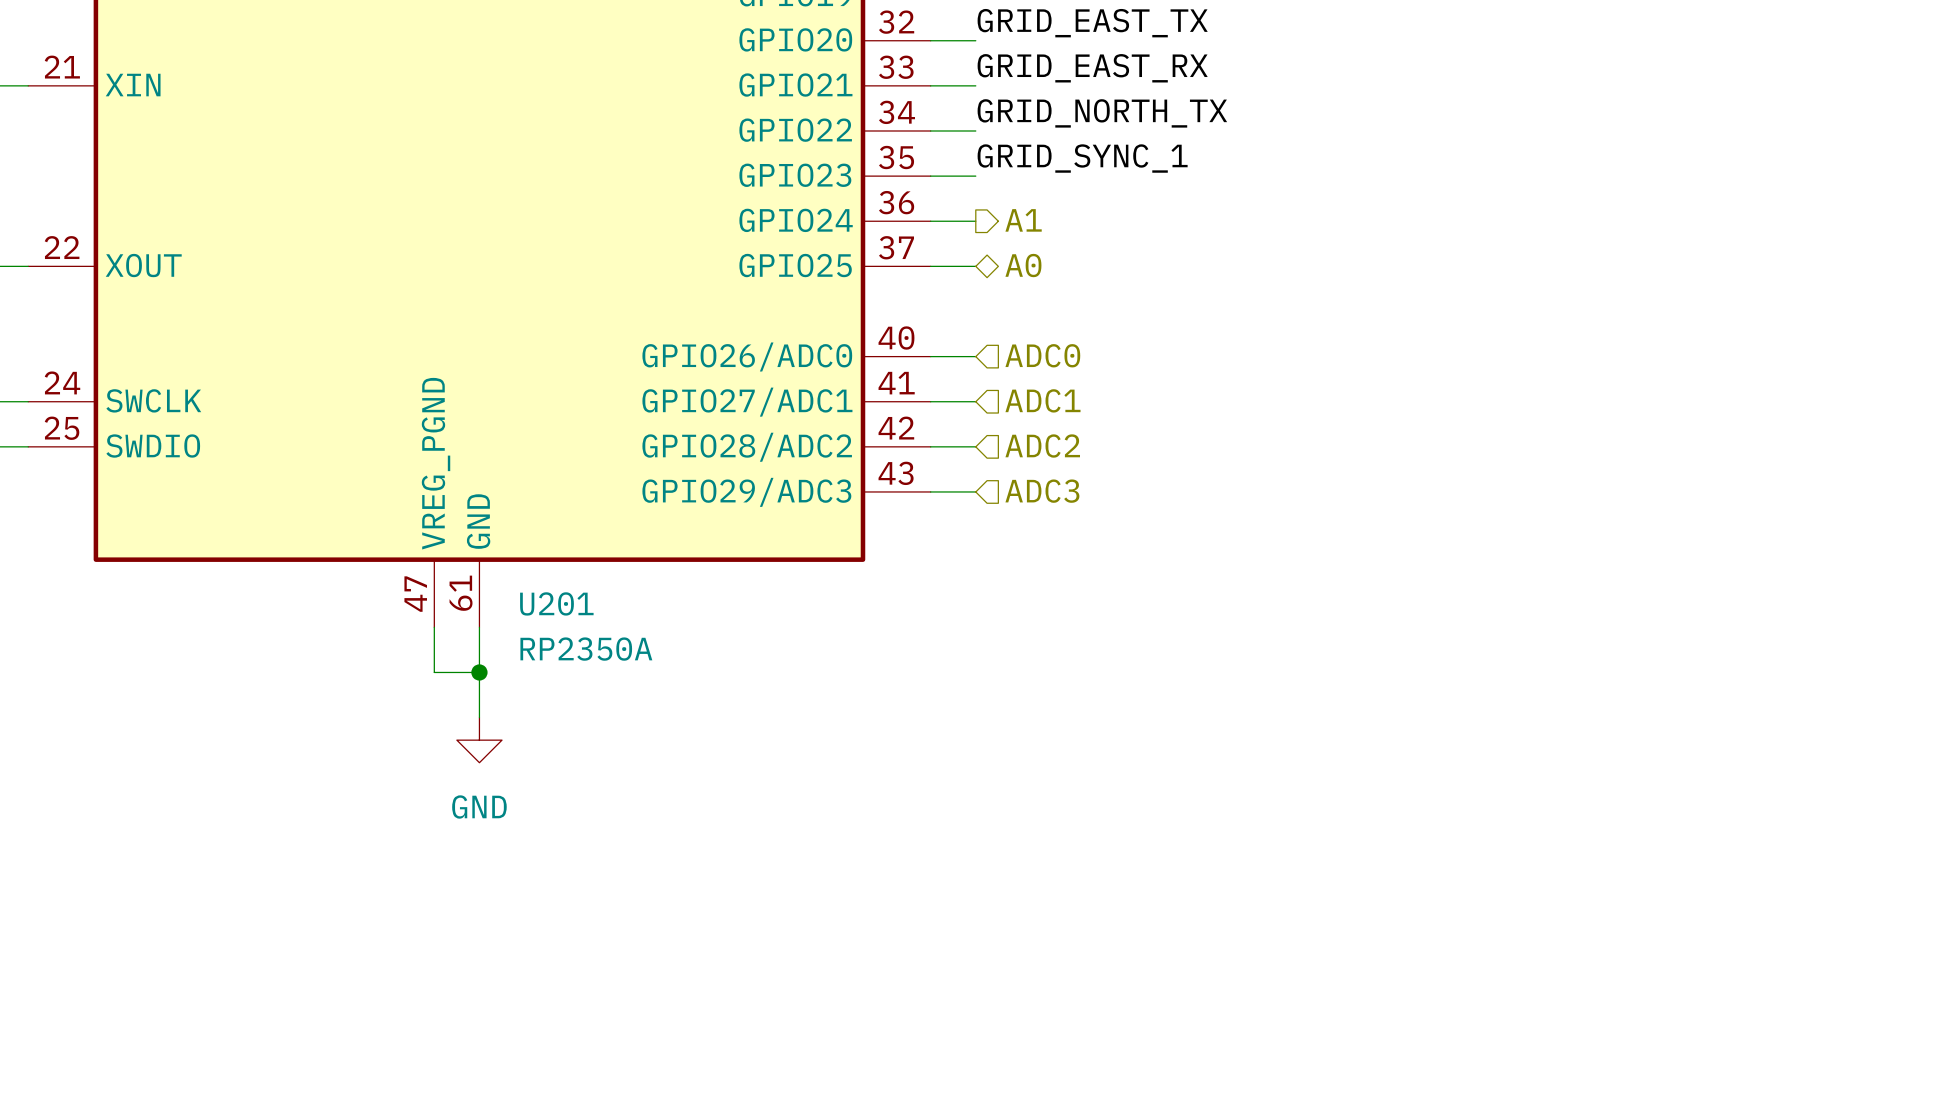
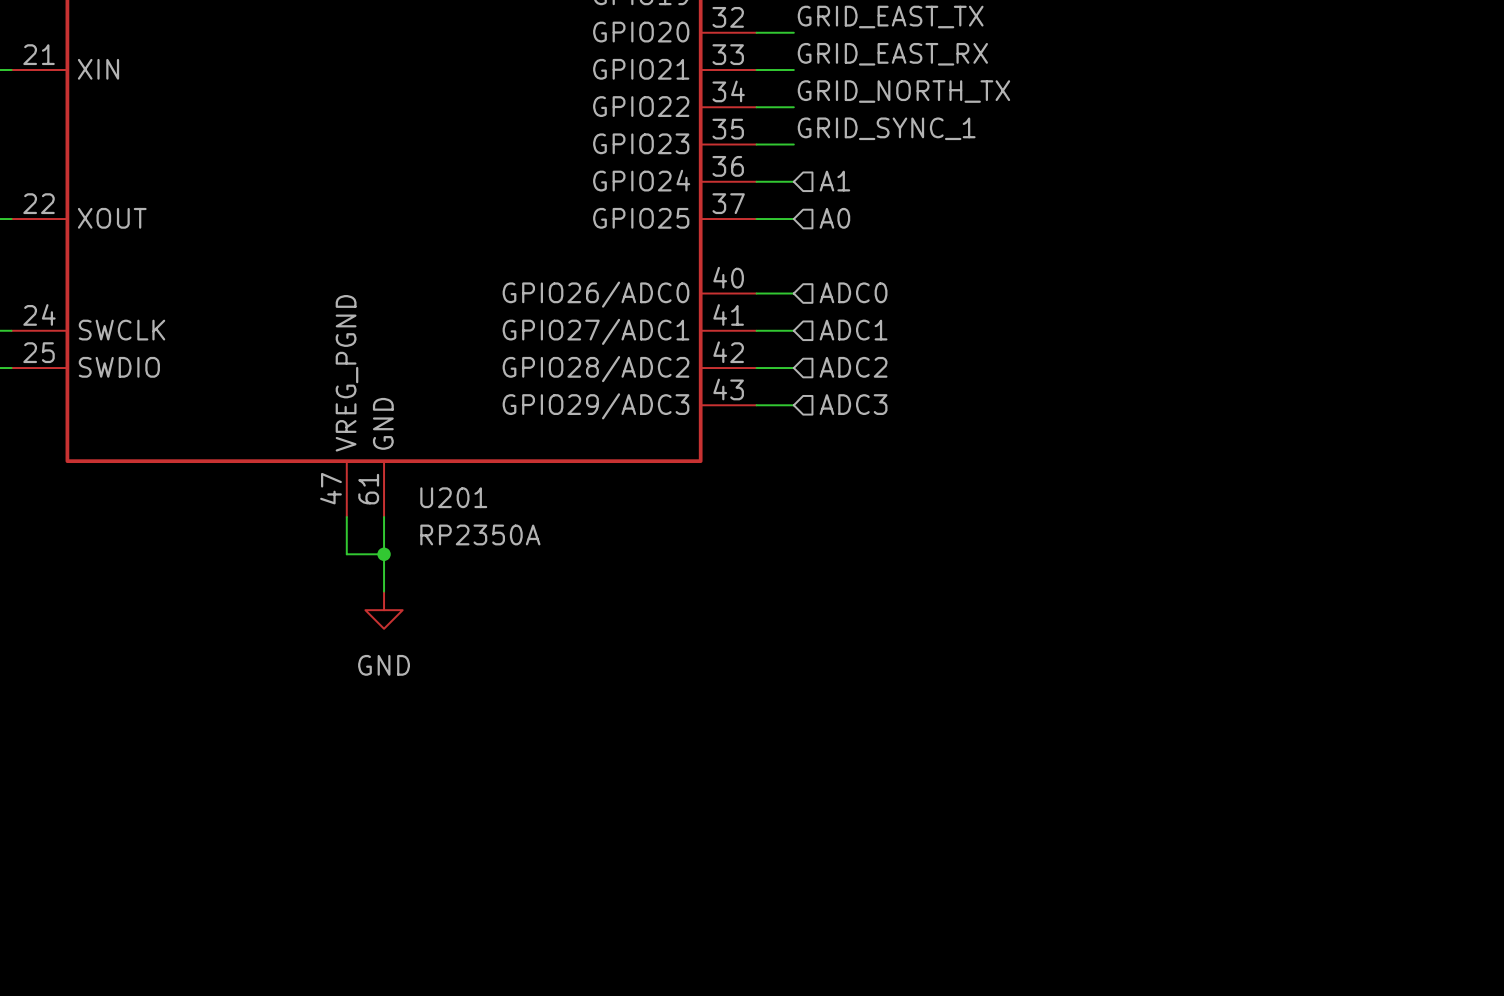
hierarchical label shape: output (1023, 220) -> input (834, 181)
hierarchical label shape: bidirectional (1023, 265) -> input (834, 218)

